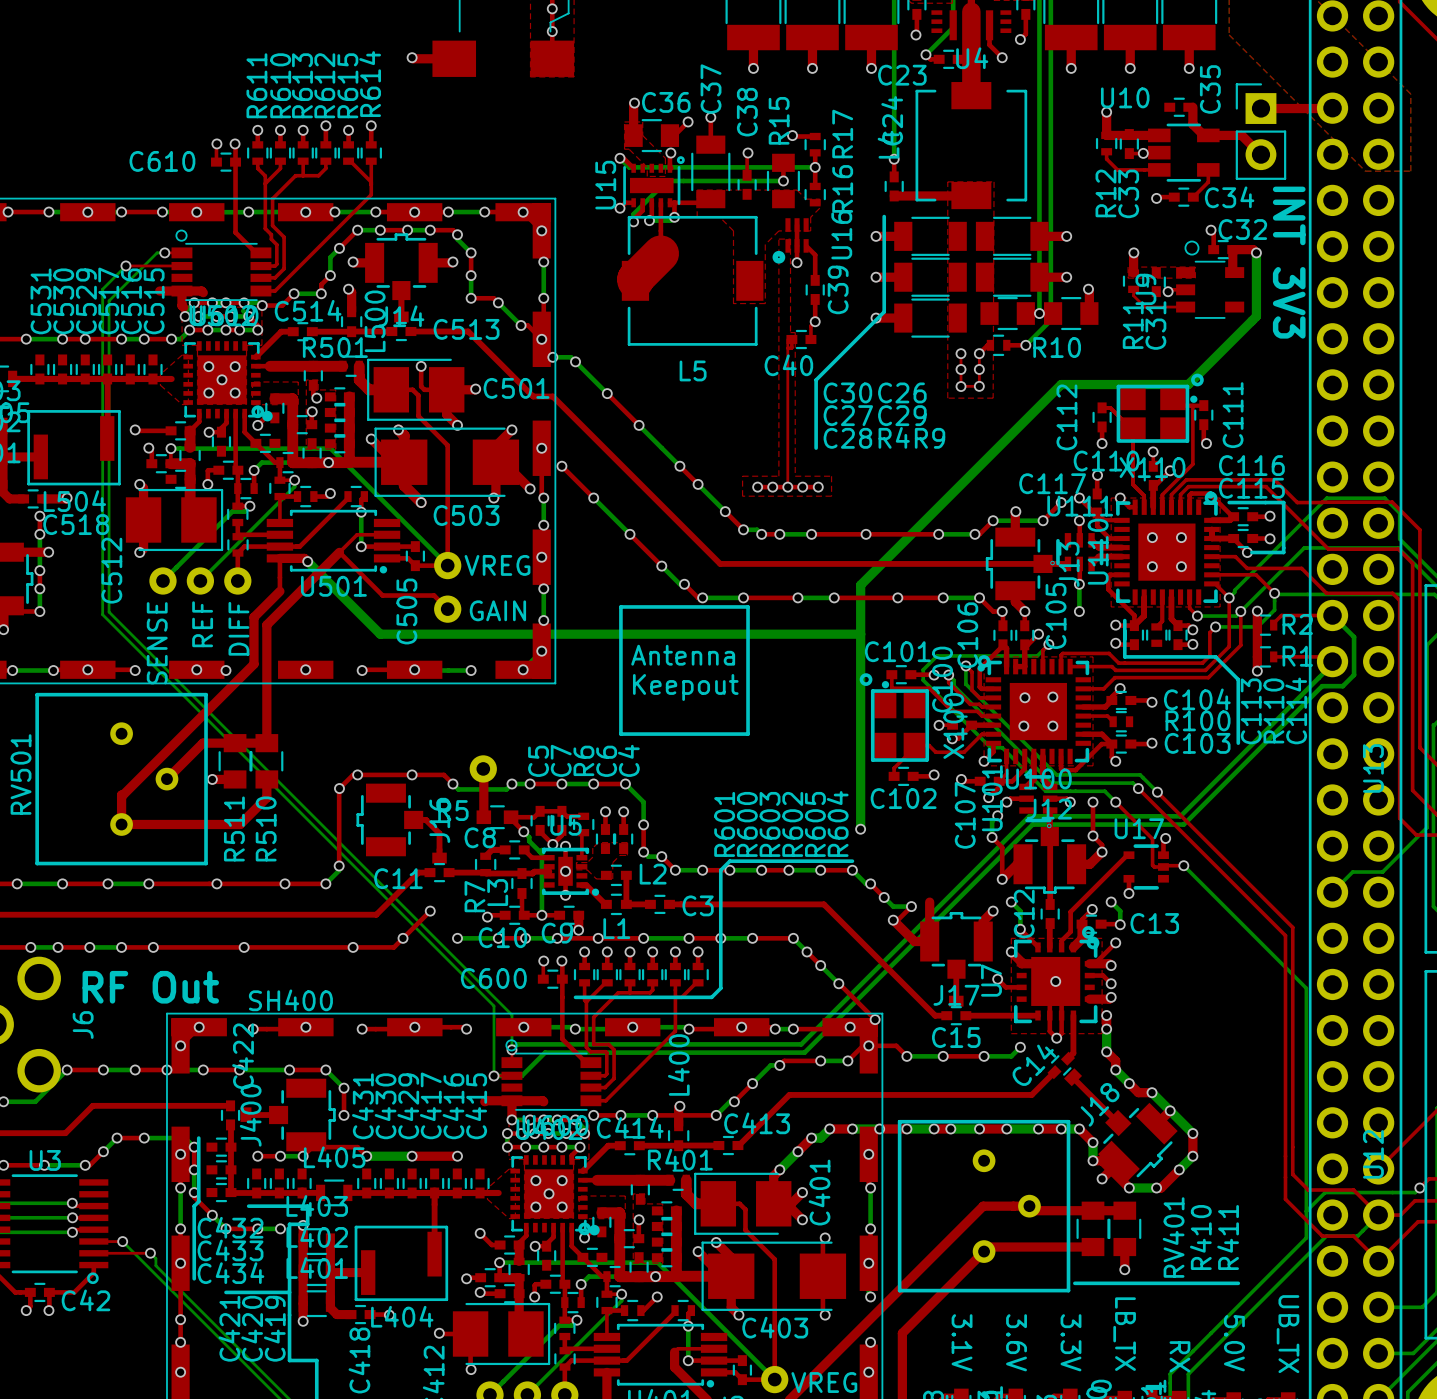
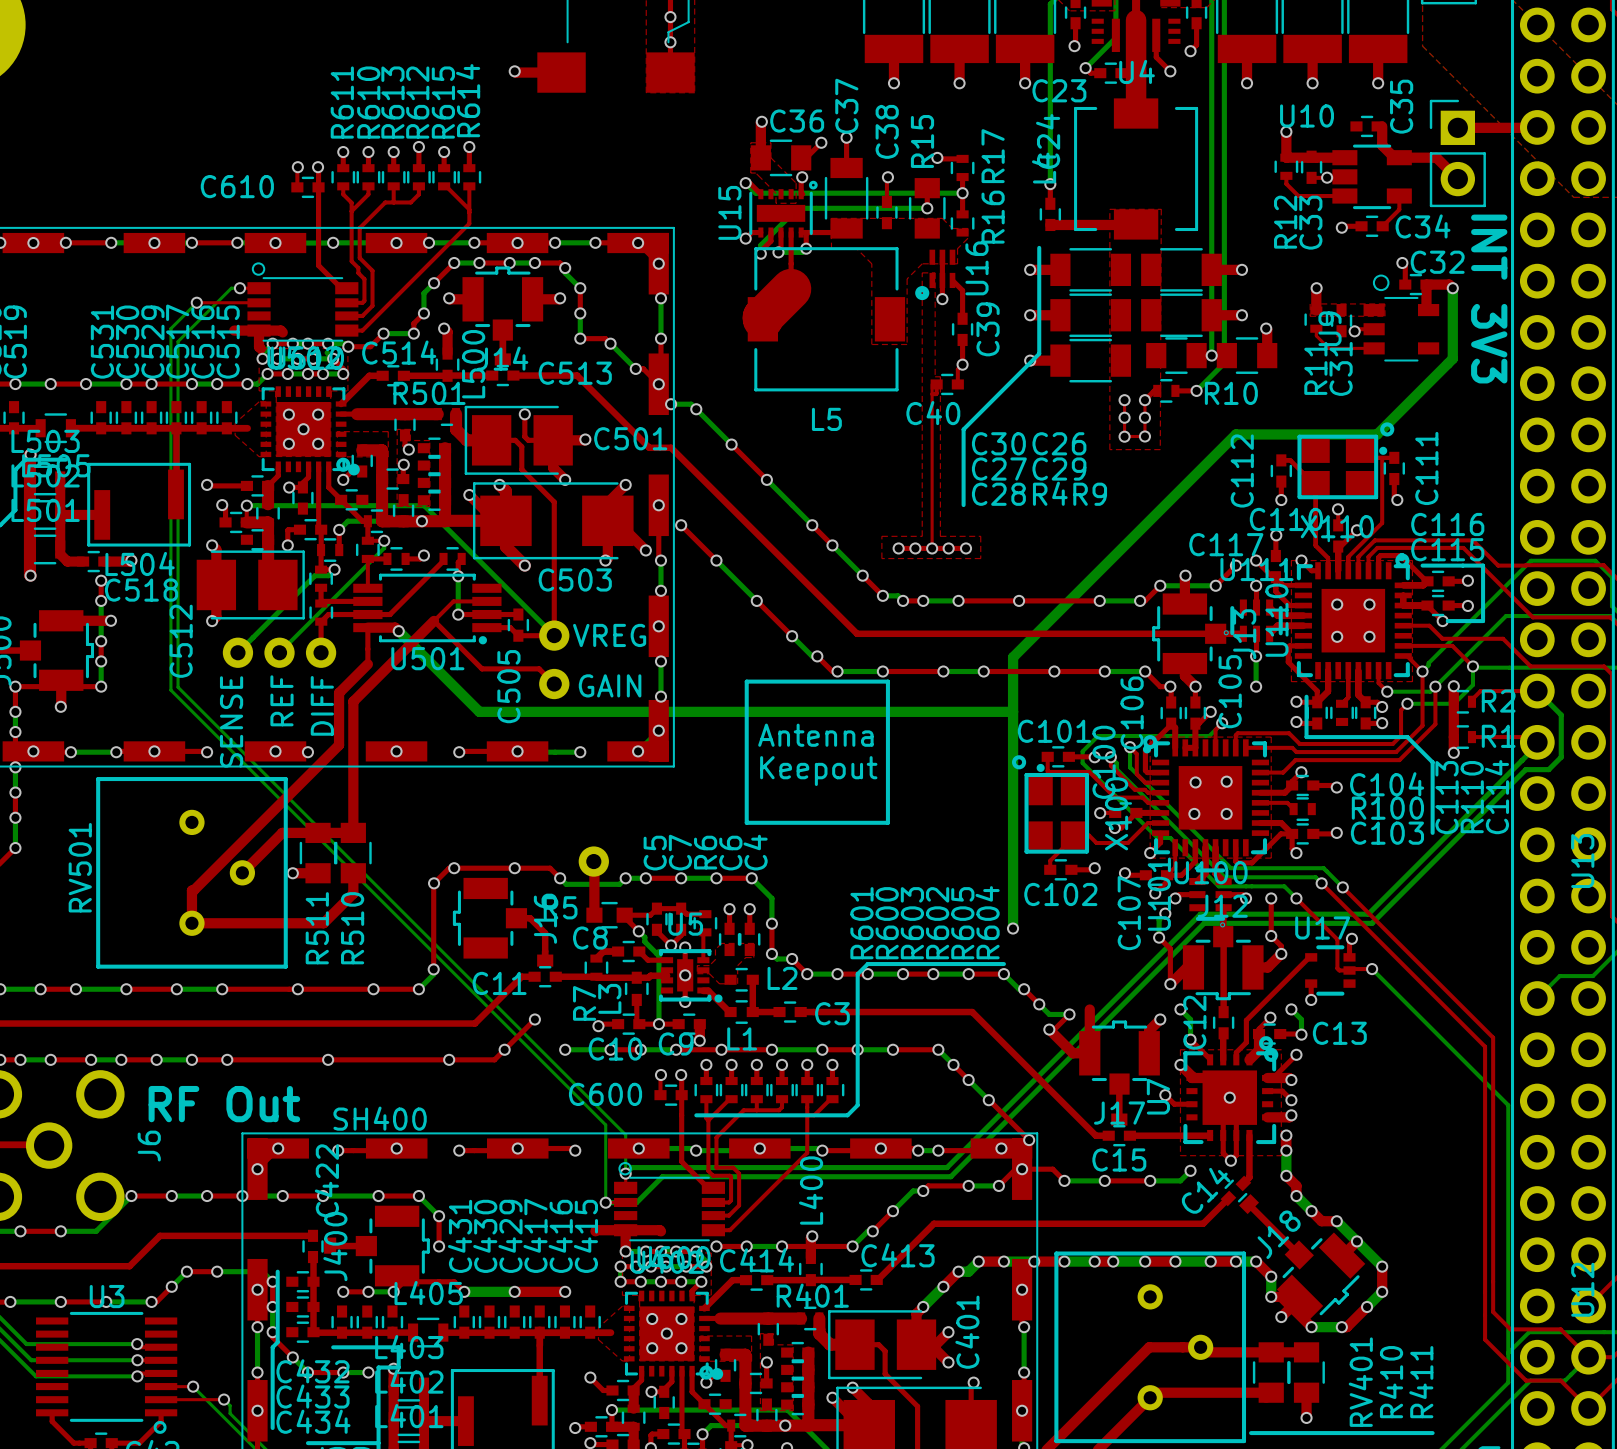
U16 name position: U16 (841, 235) -> U16 (976, 268)

